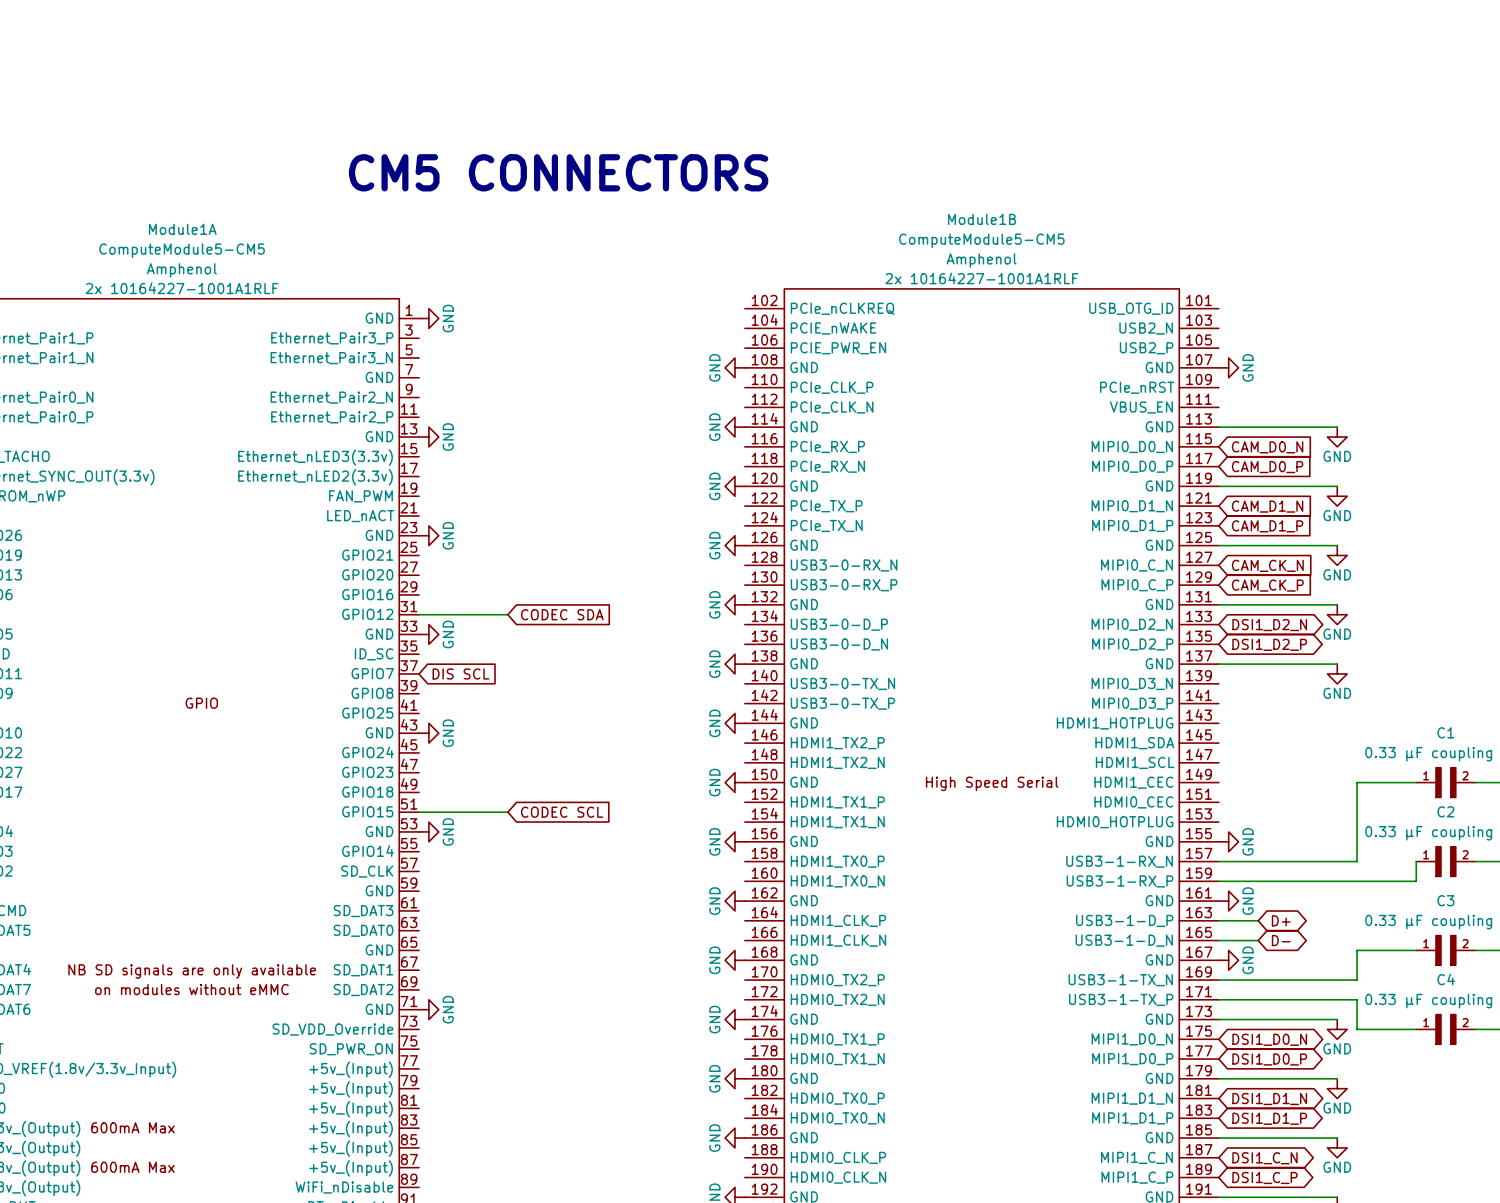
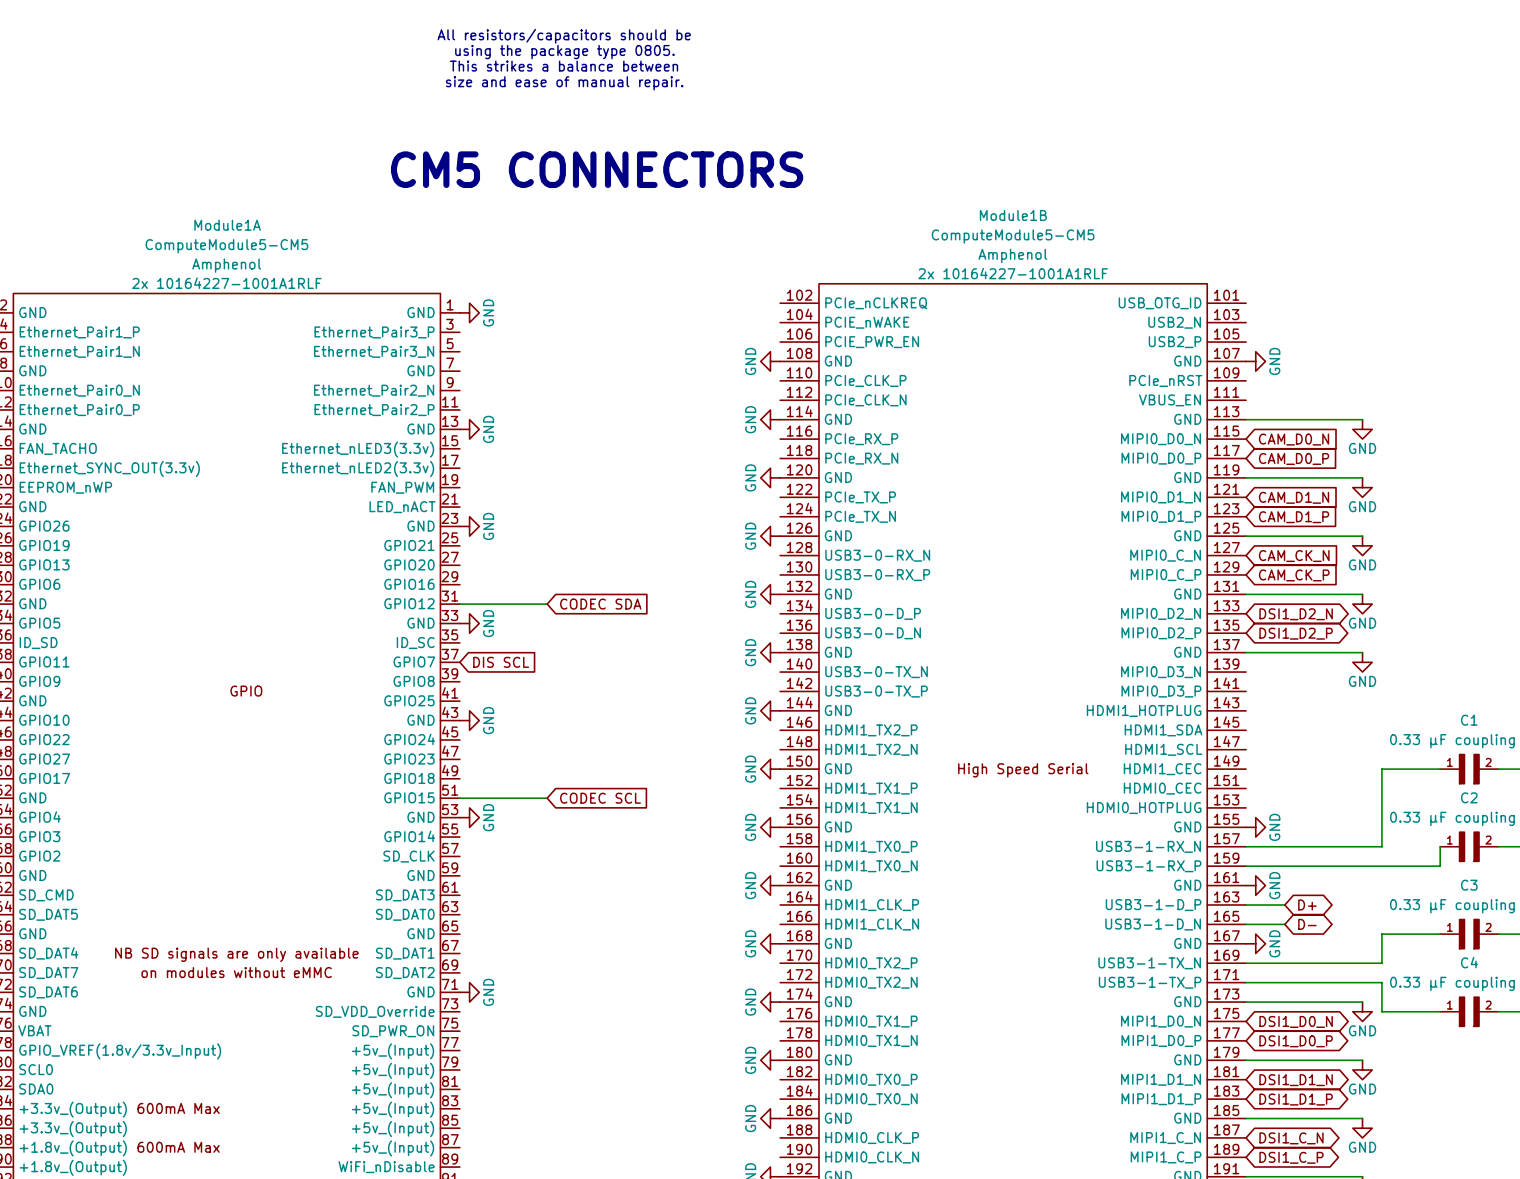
text: none -> All resistors/capacitors should be (564, 36)
text: none -> using the package type 0805. (564, 52)
text: none -> This strikes a balance between (563, 66)
text: none -> size and ease of manual repair. (564, 83)

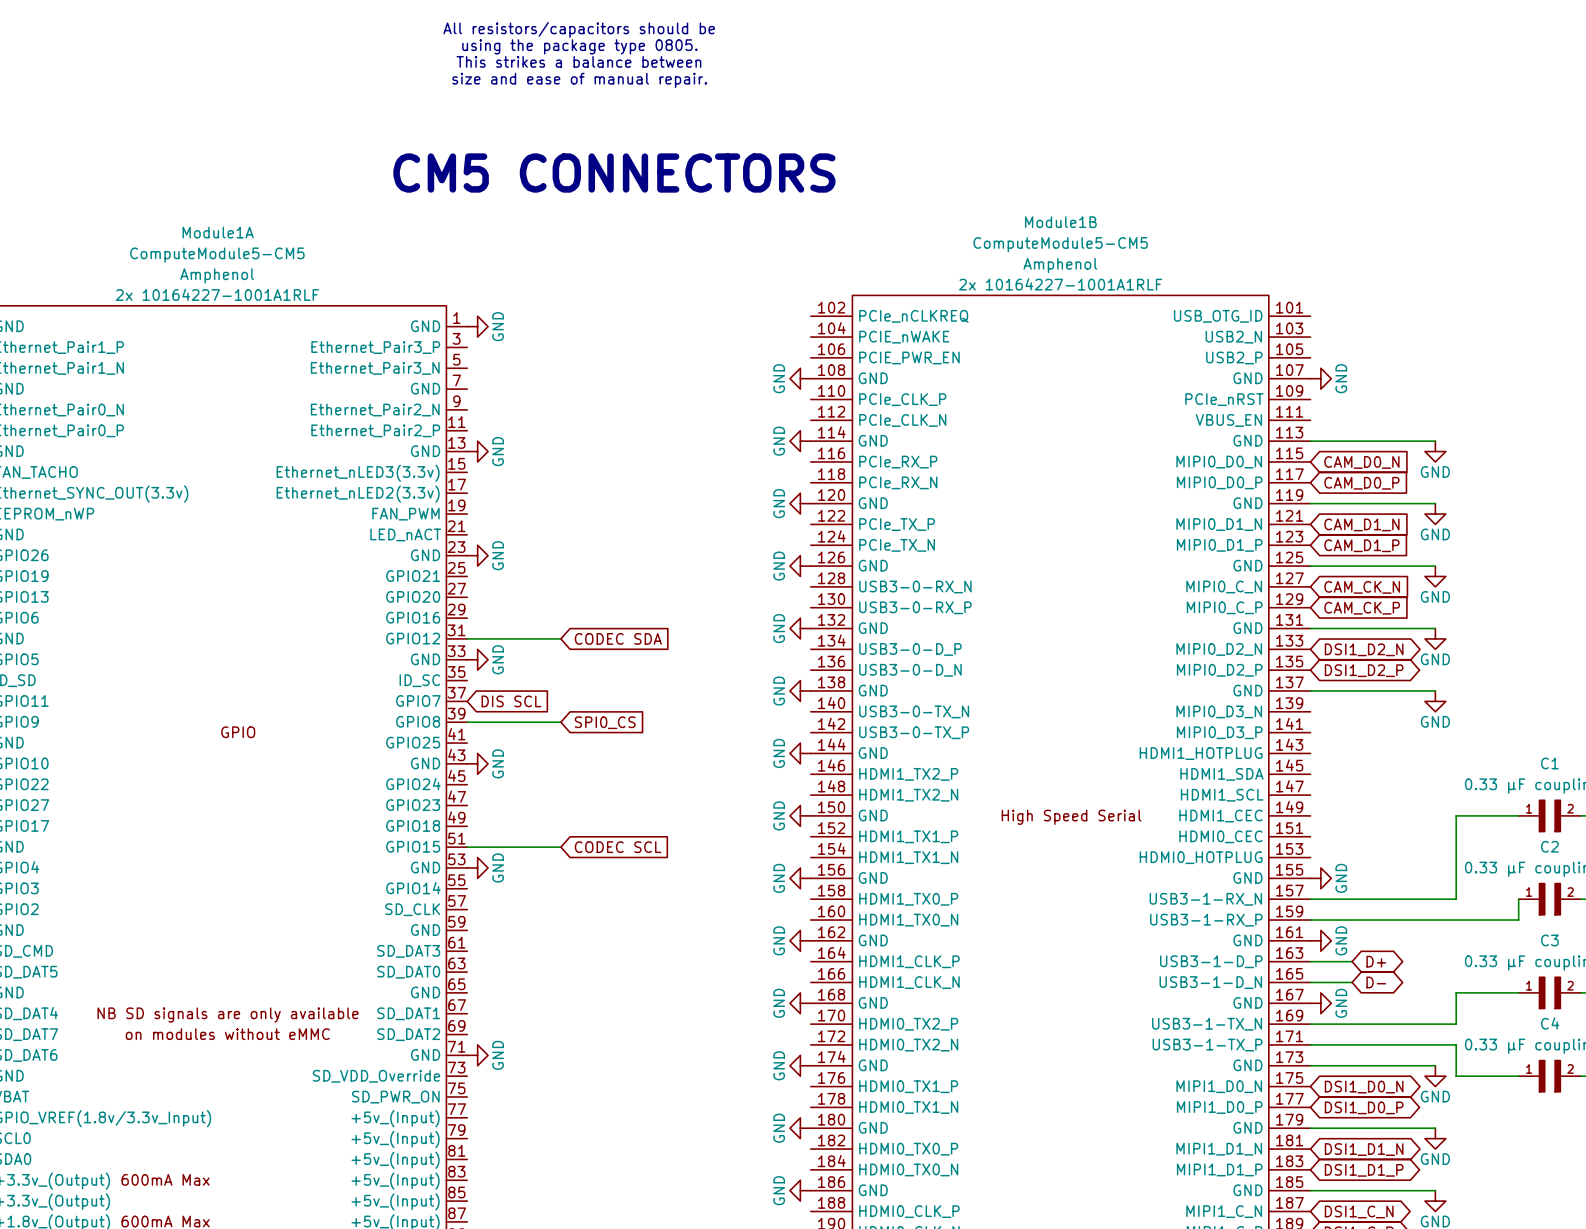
wire: none -> (467, 722) (560, 722)
global label: none -> SPI0_CS (605, 722)

